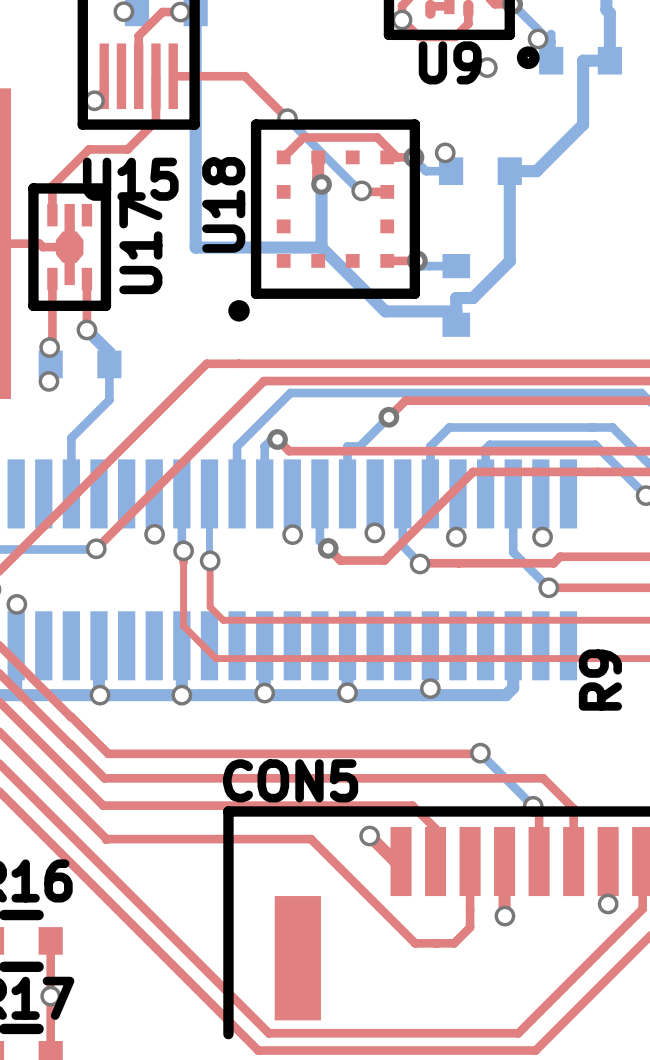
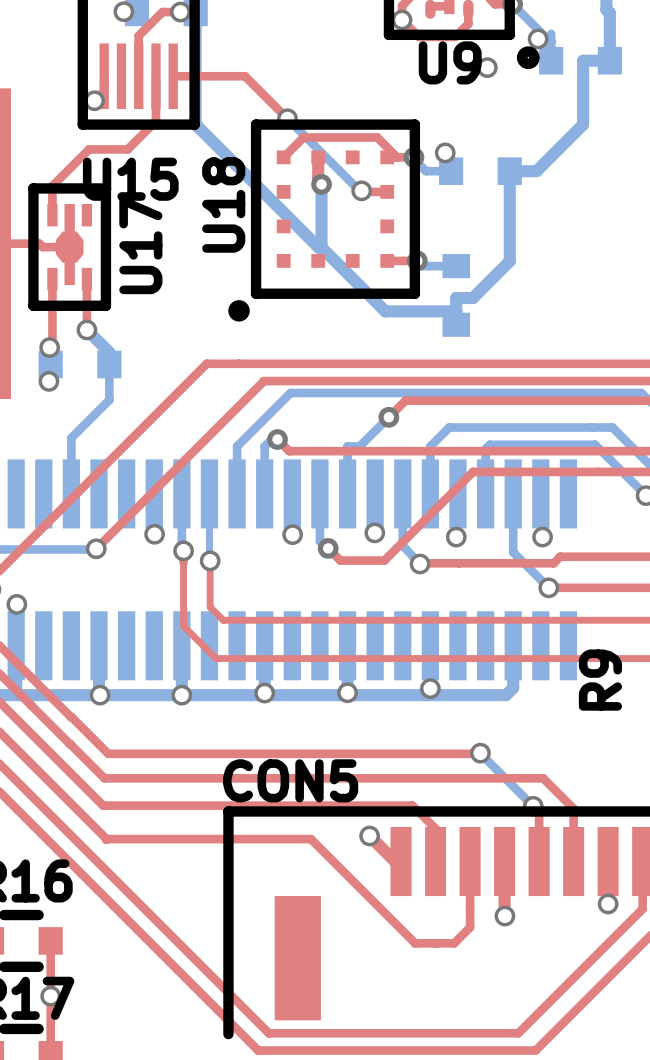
bottom track: (195, 124) (195, 247) (318, 247) -> (195, 124) (318, 247)

